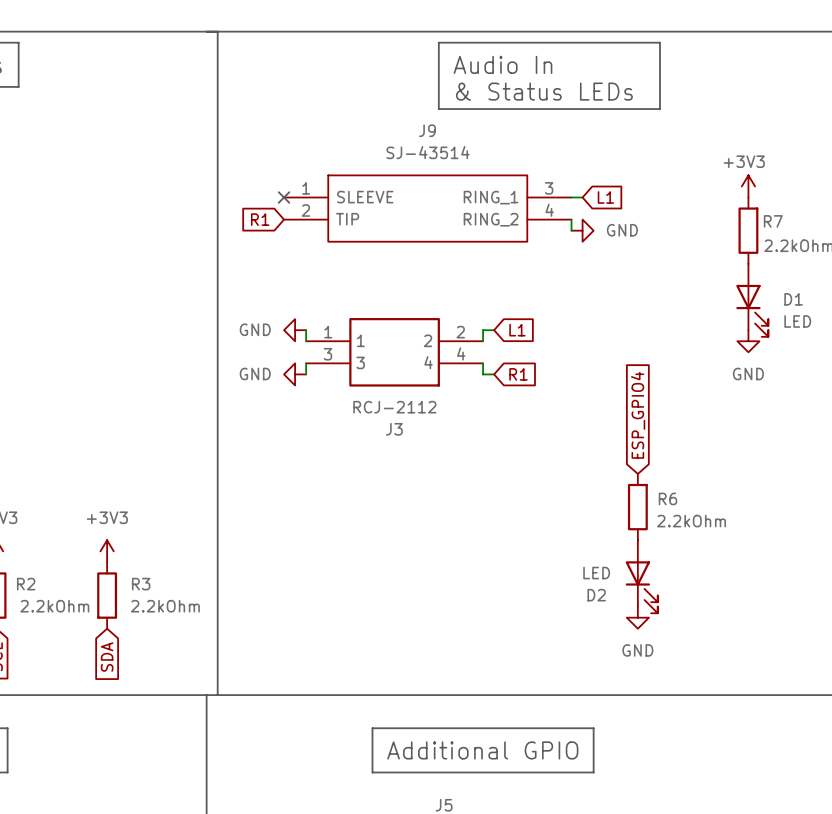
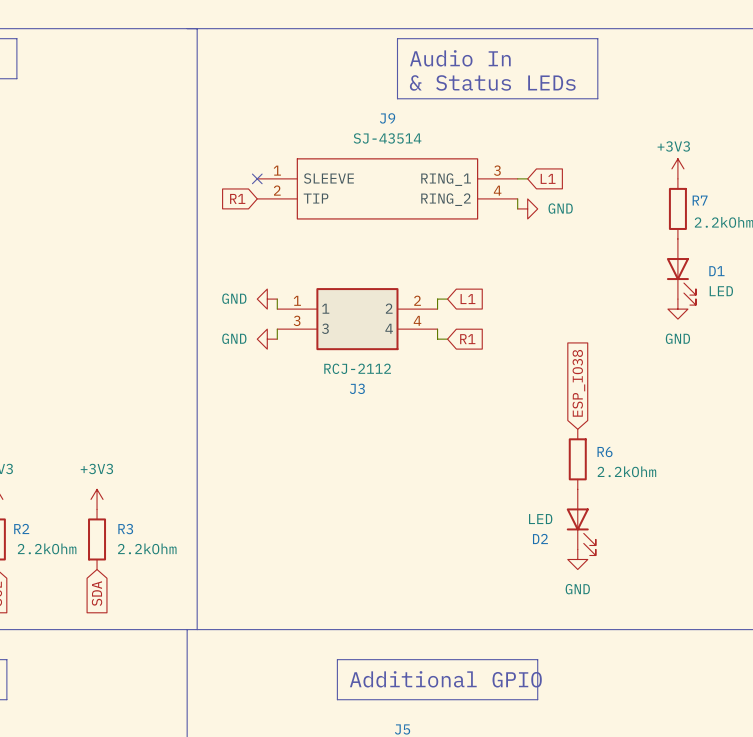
global label: ESP_GPIO4 (638, 415) -> ESP_IO38 (578, 383)

